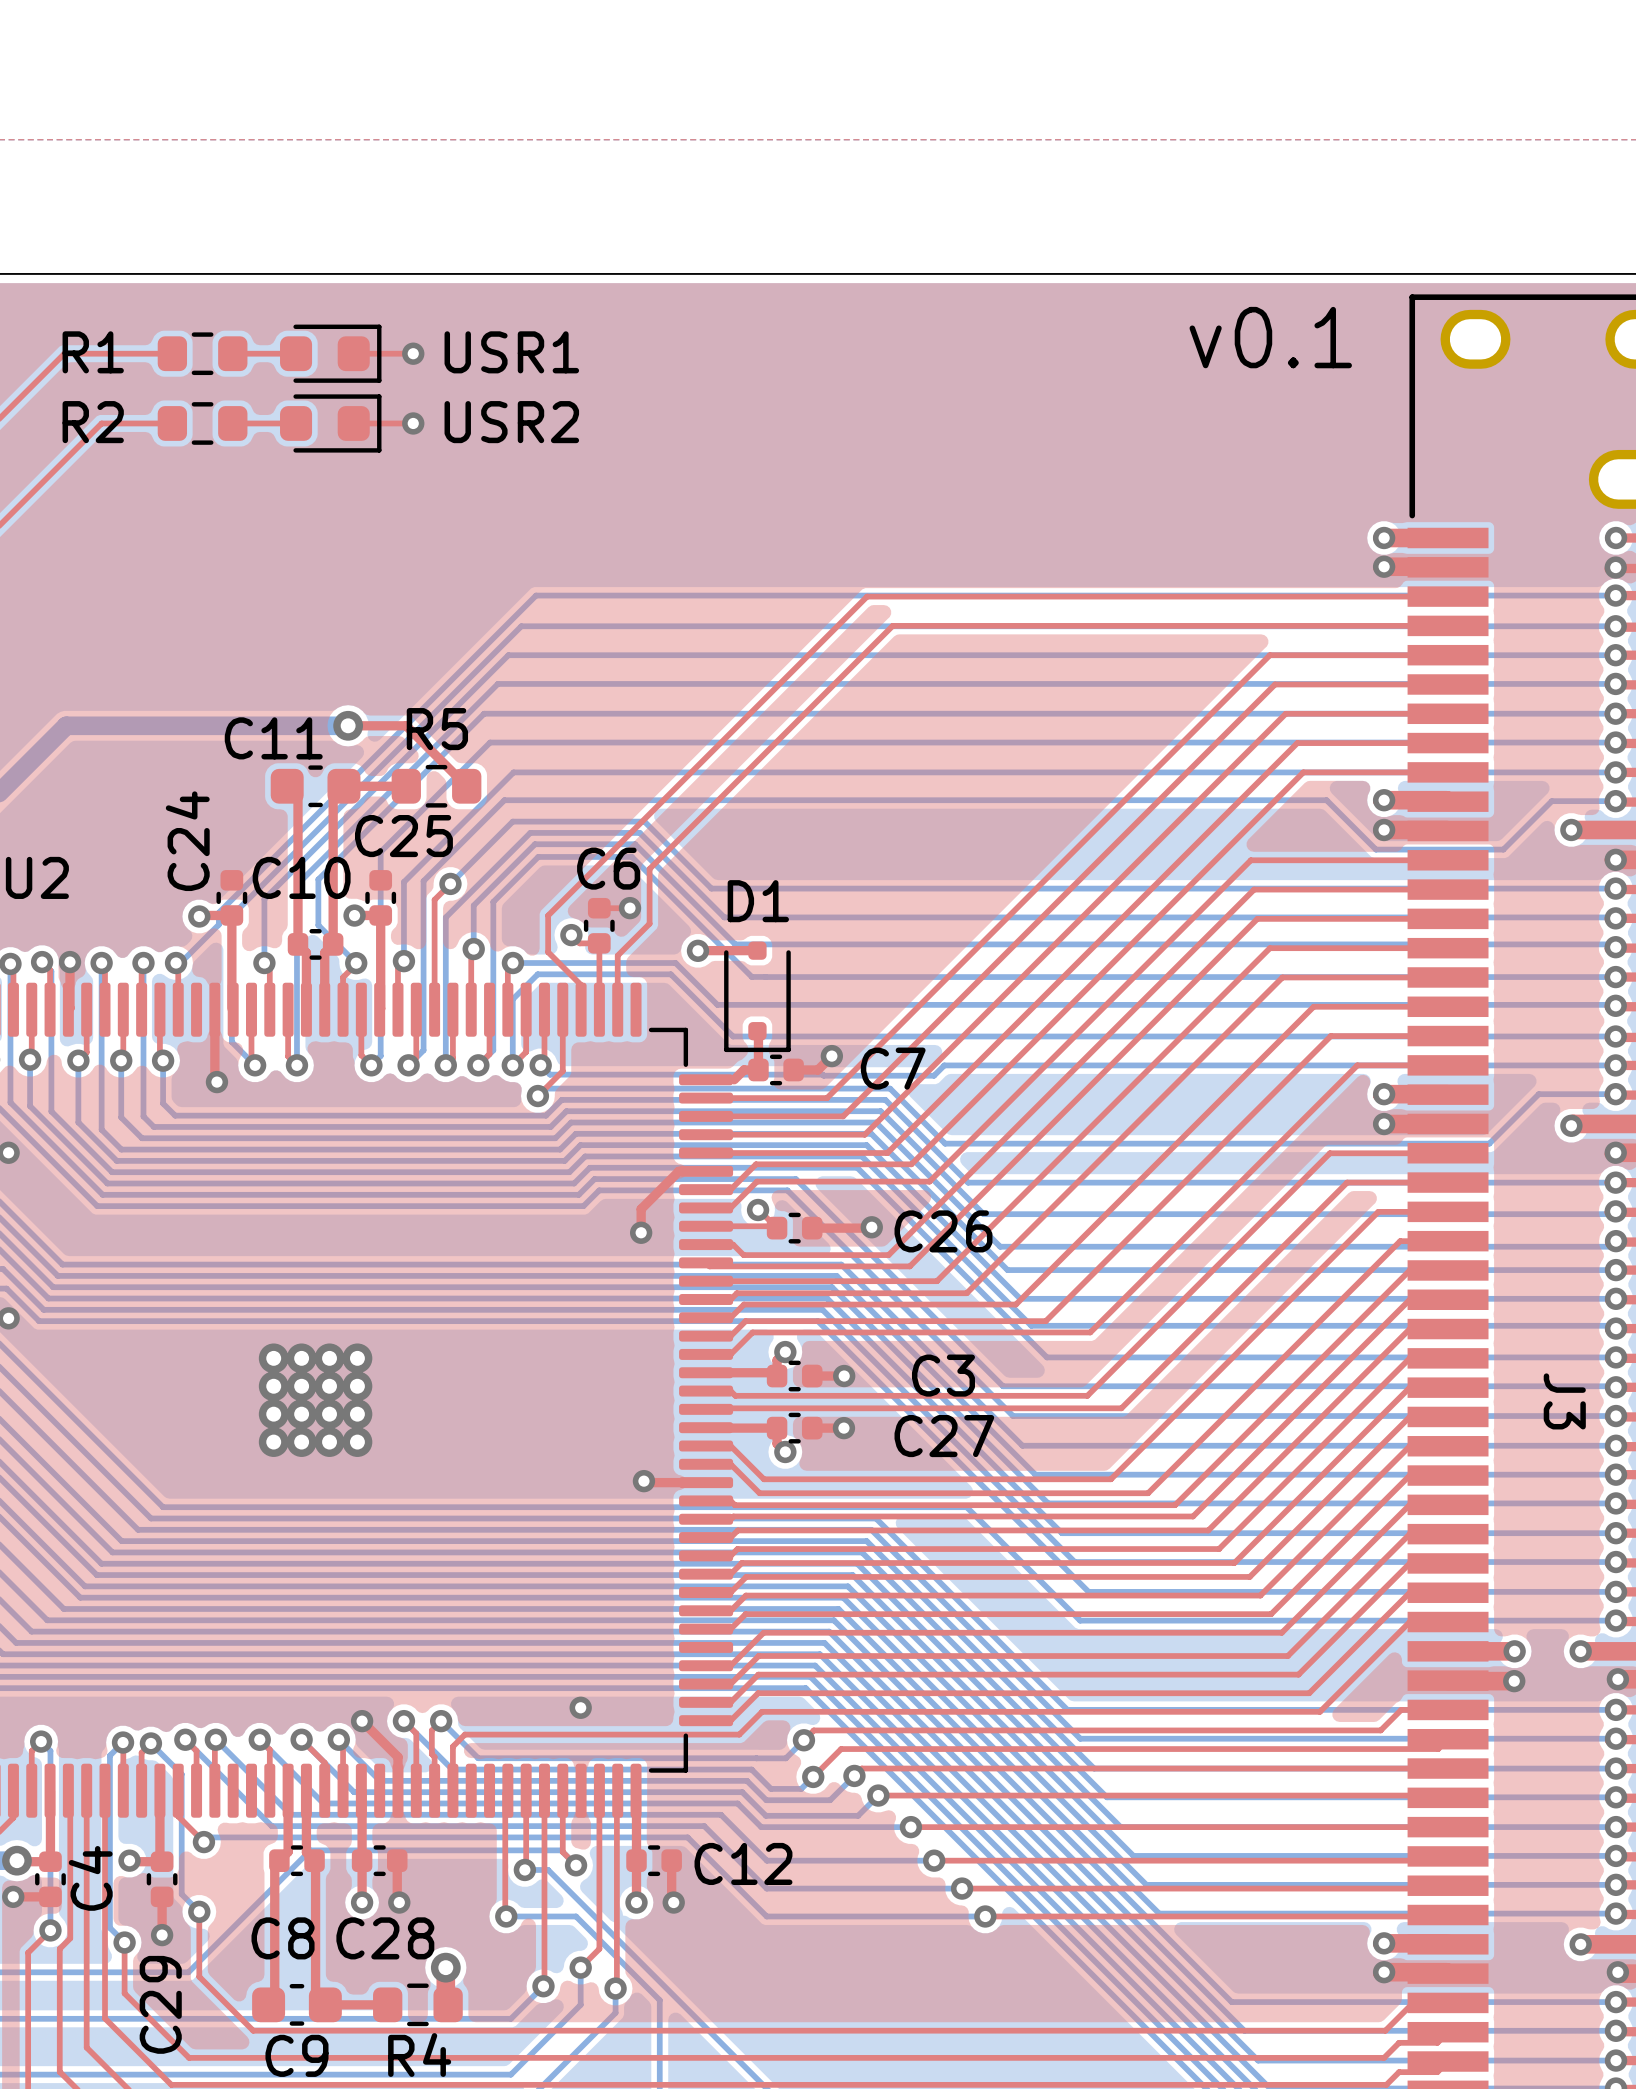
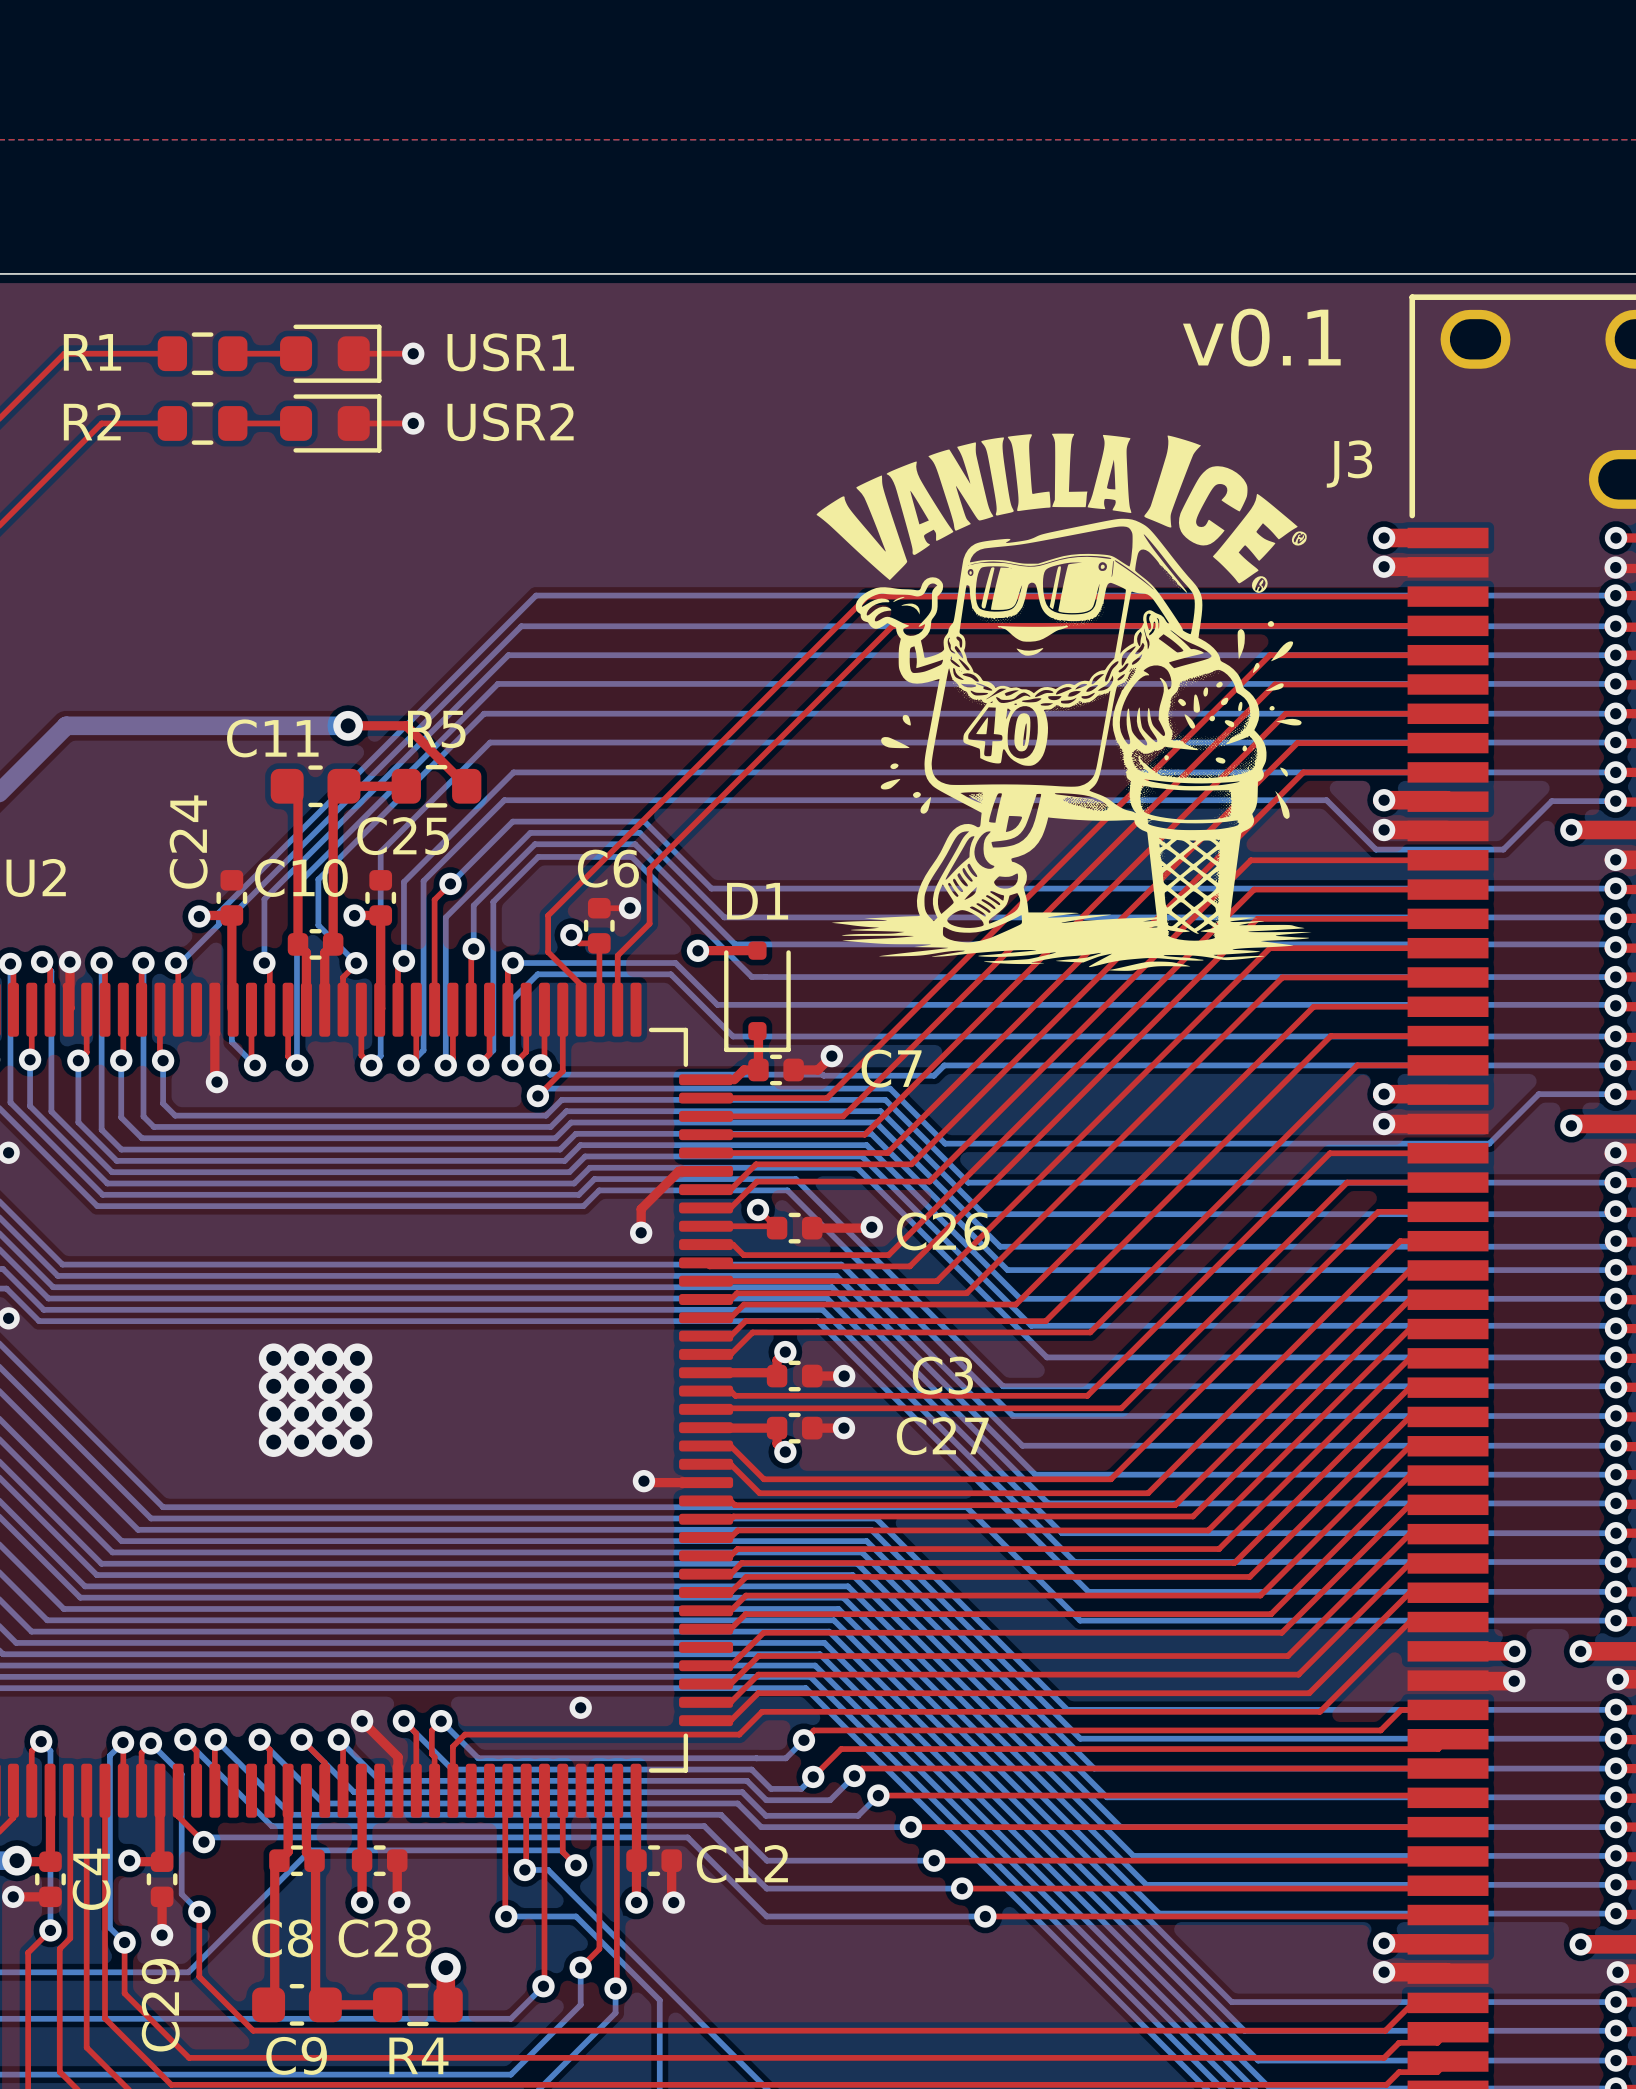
drawing: none -> [816, 433, 1312, 971]
J3 name rotation: 0° (1564, 1401) -> 90° counterclockwise (1349, 464)
J3 name position: J3 (1564, 1401) -> J3 (1349, 464)

